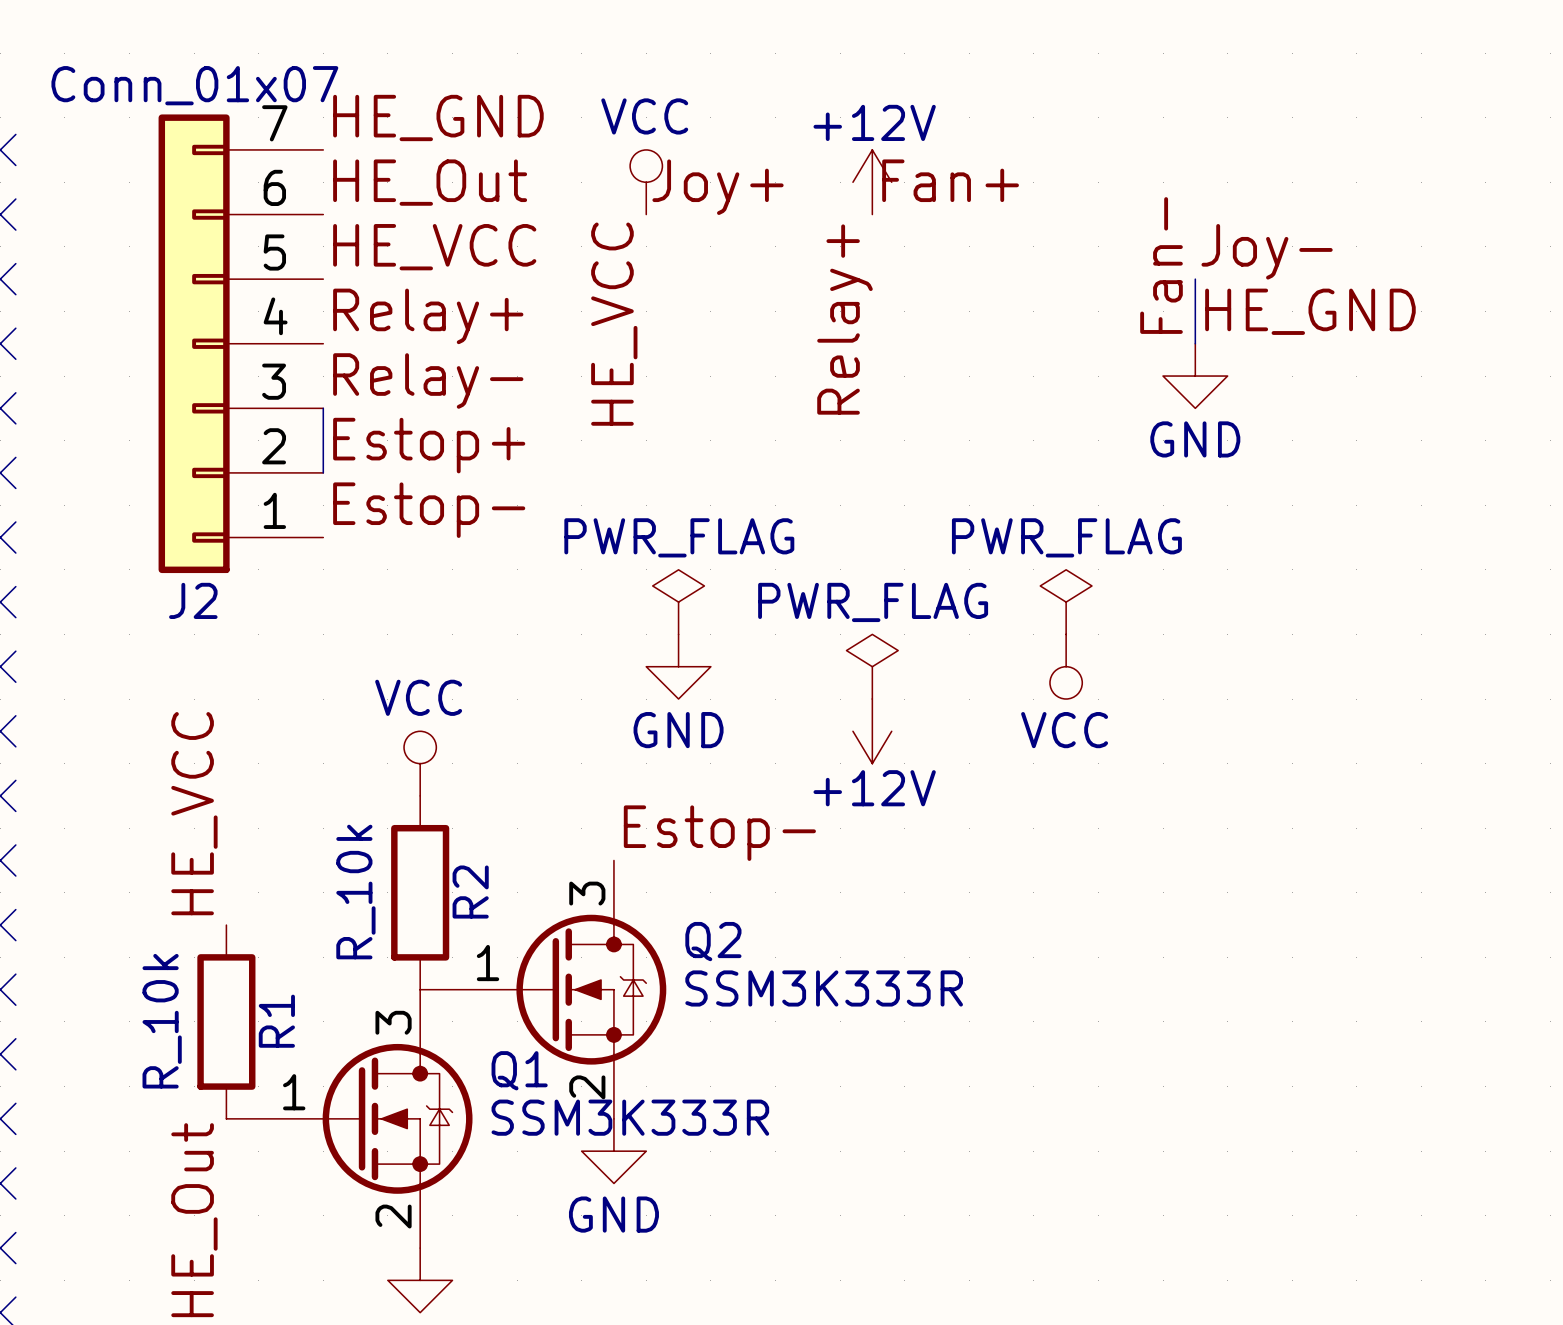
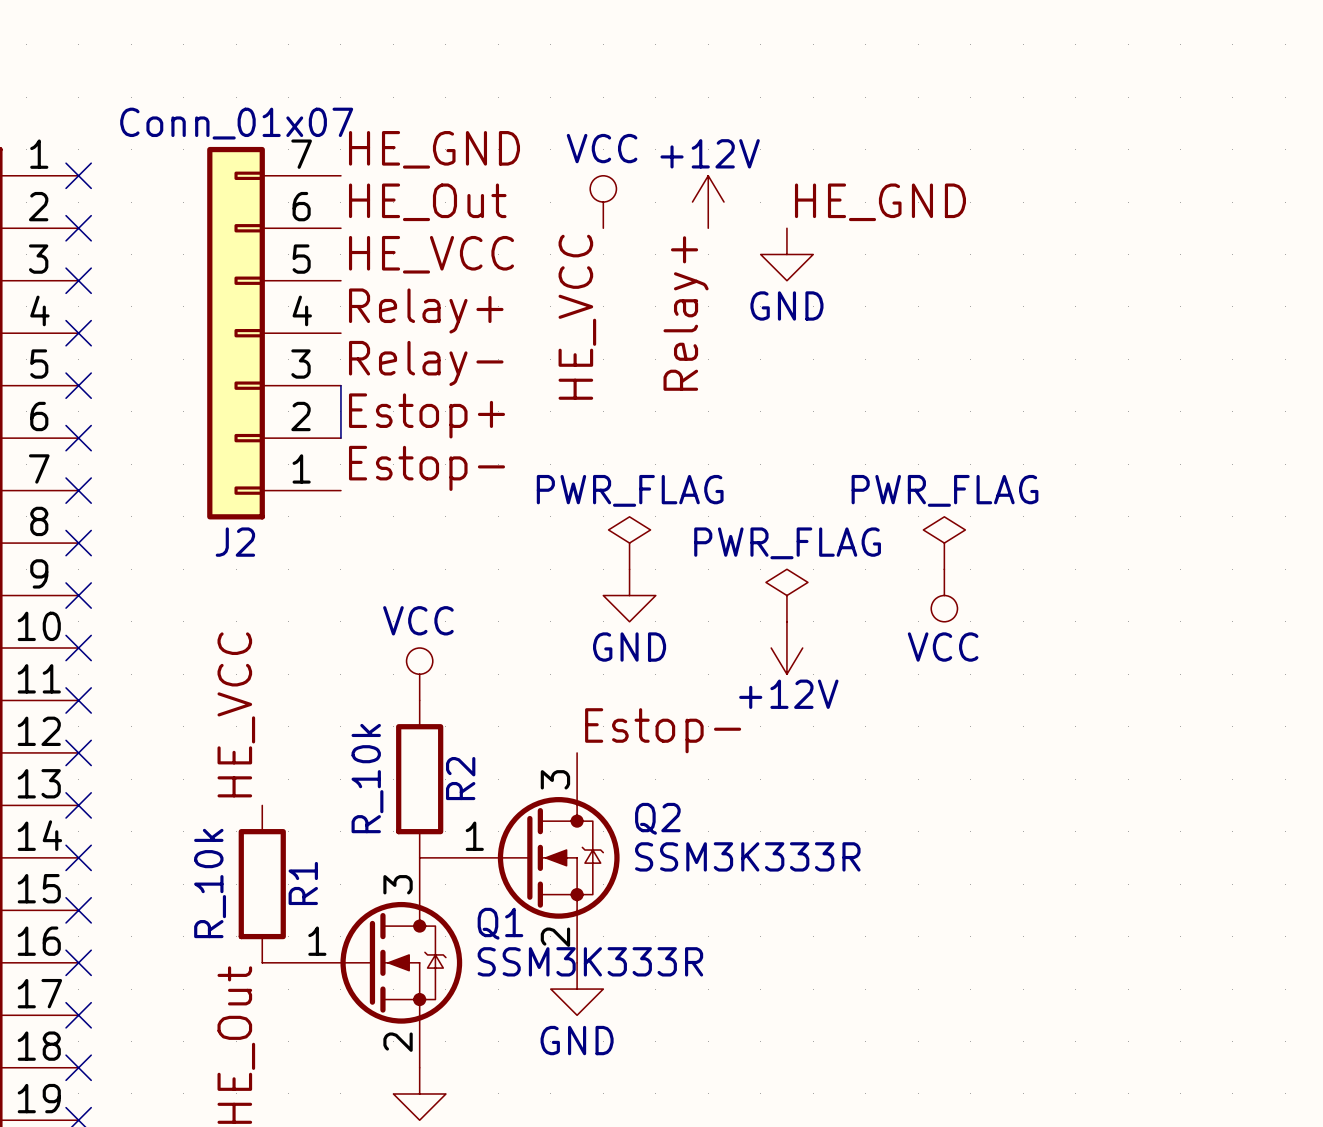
label: Fan+ (950, 180) -> HE_GND (880, 202)
power symbol position: +12V (872, 182) -> +12V (708, 202)
label: Joy+ (718, 187) -> none
label: Joy- (1267, 251) -> none
label: Fan- (1161, 265) -> none
wire: (1195, 279) (1195, 343) -> none
label: HE_GND (1310, 311) -> none
label position: Relay+ (844, 319) -> Relay+ (686, 313)
power symbol position: GND (1195, 376) -> GND (786, 254)

